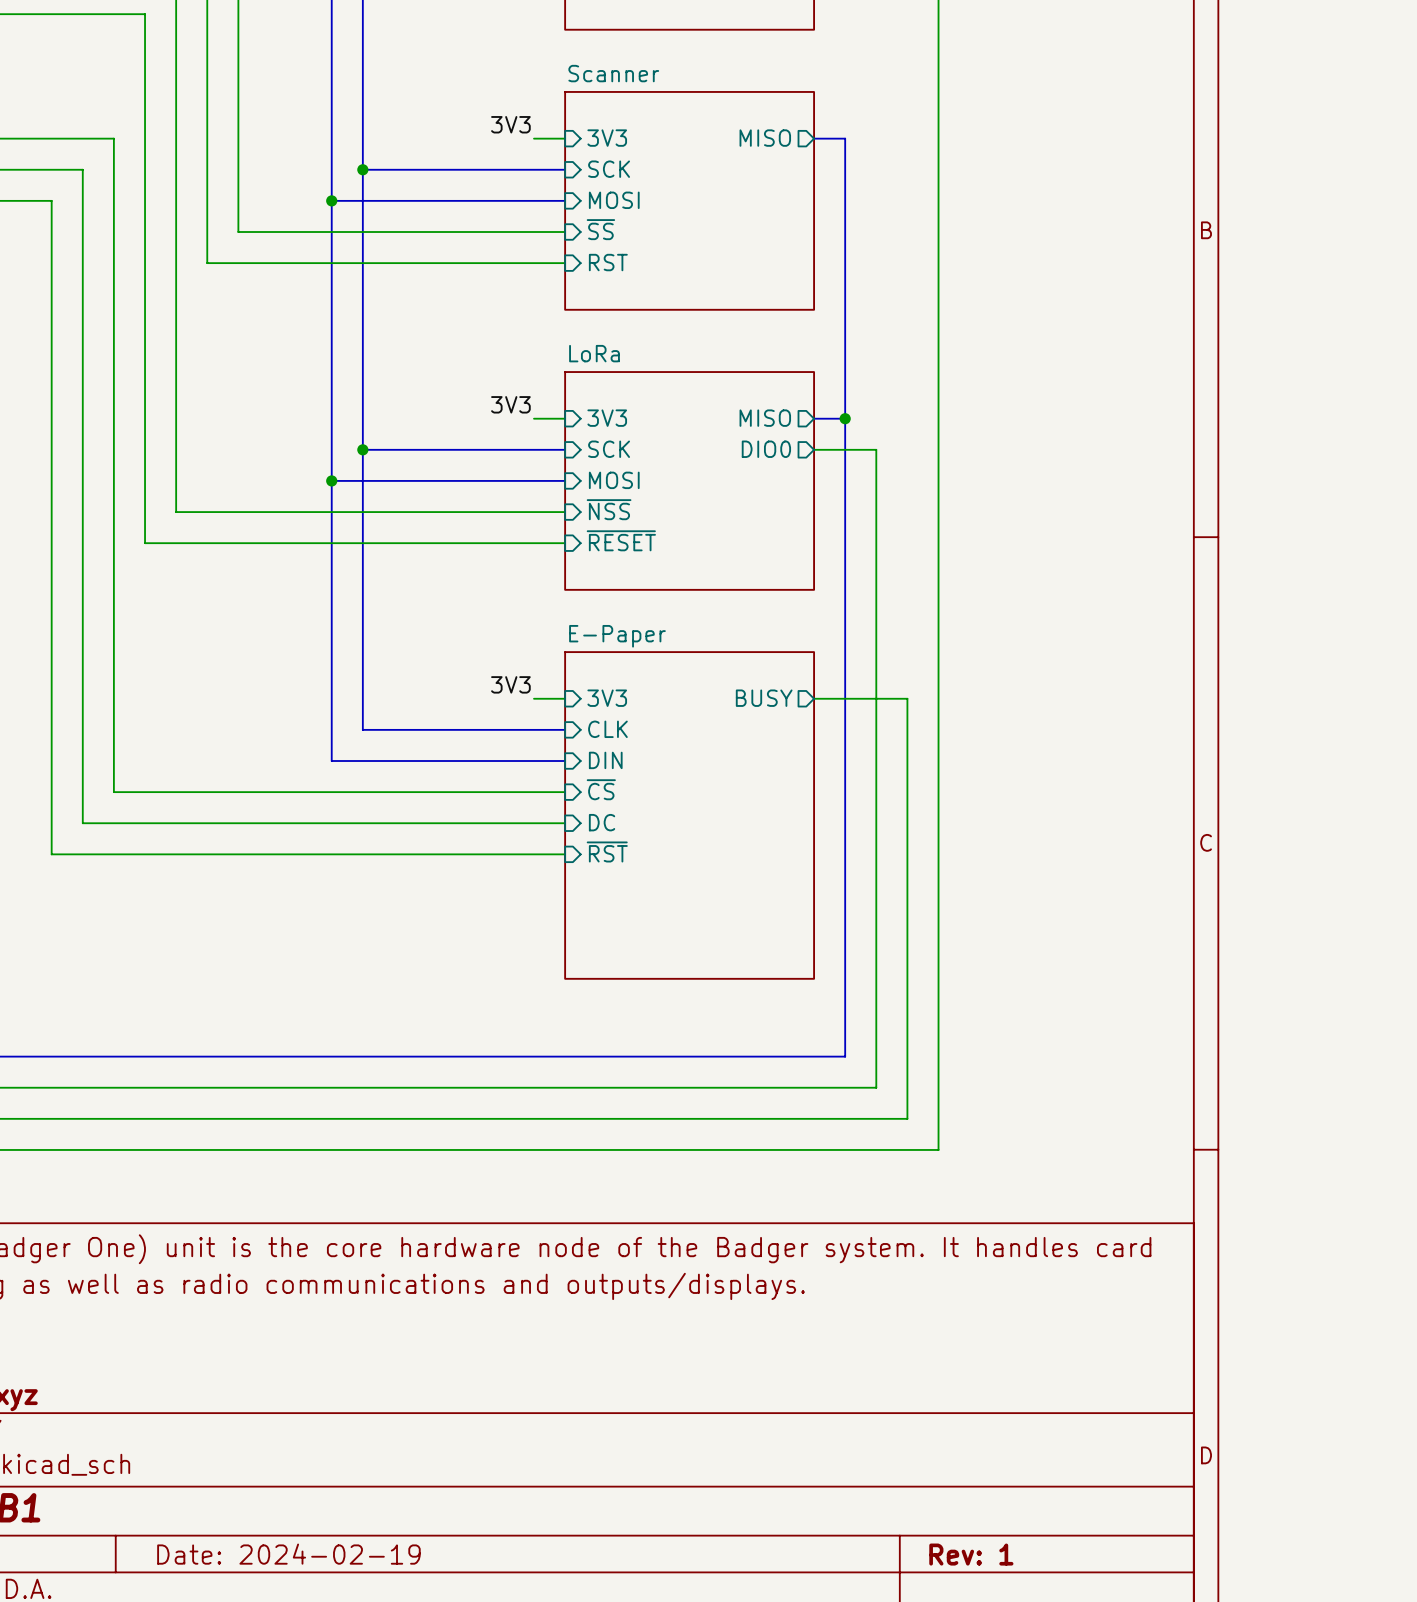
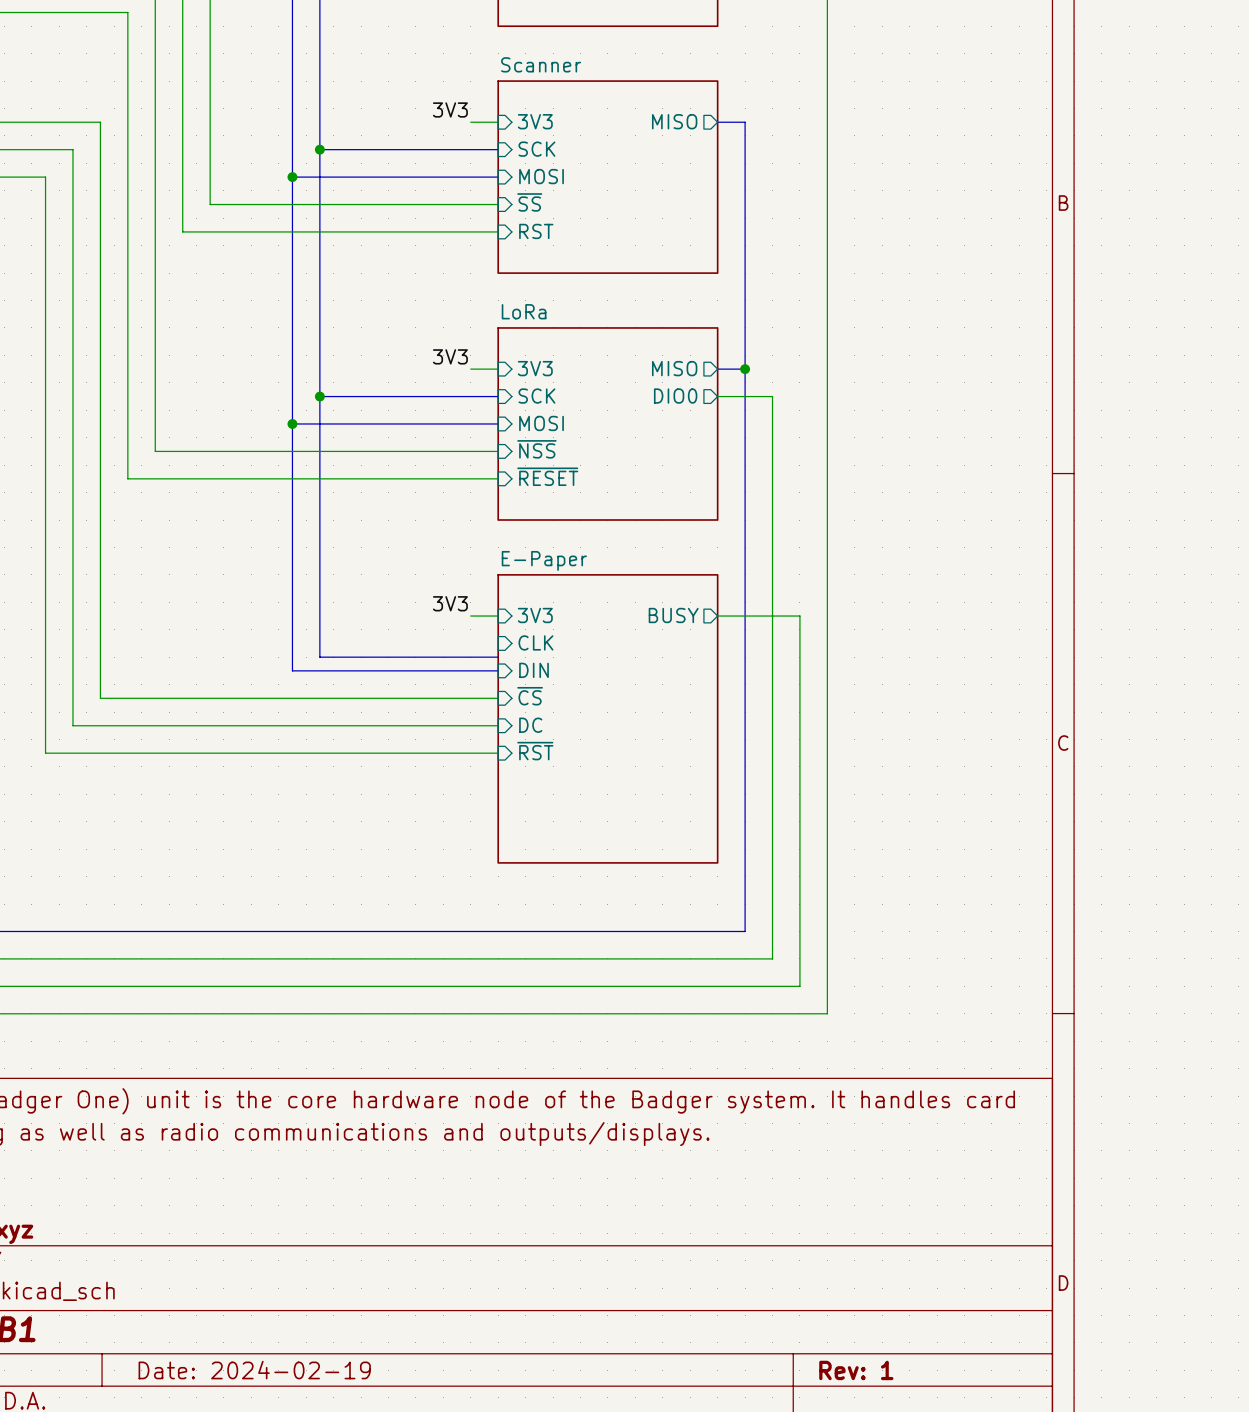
bus: (362, 729) (565, 729) -> (319, 643) (319, 657) (498, 657)

